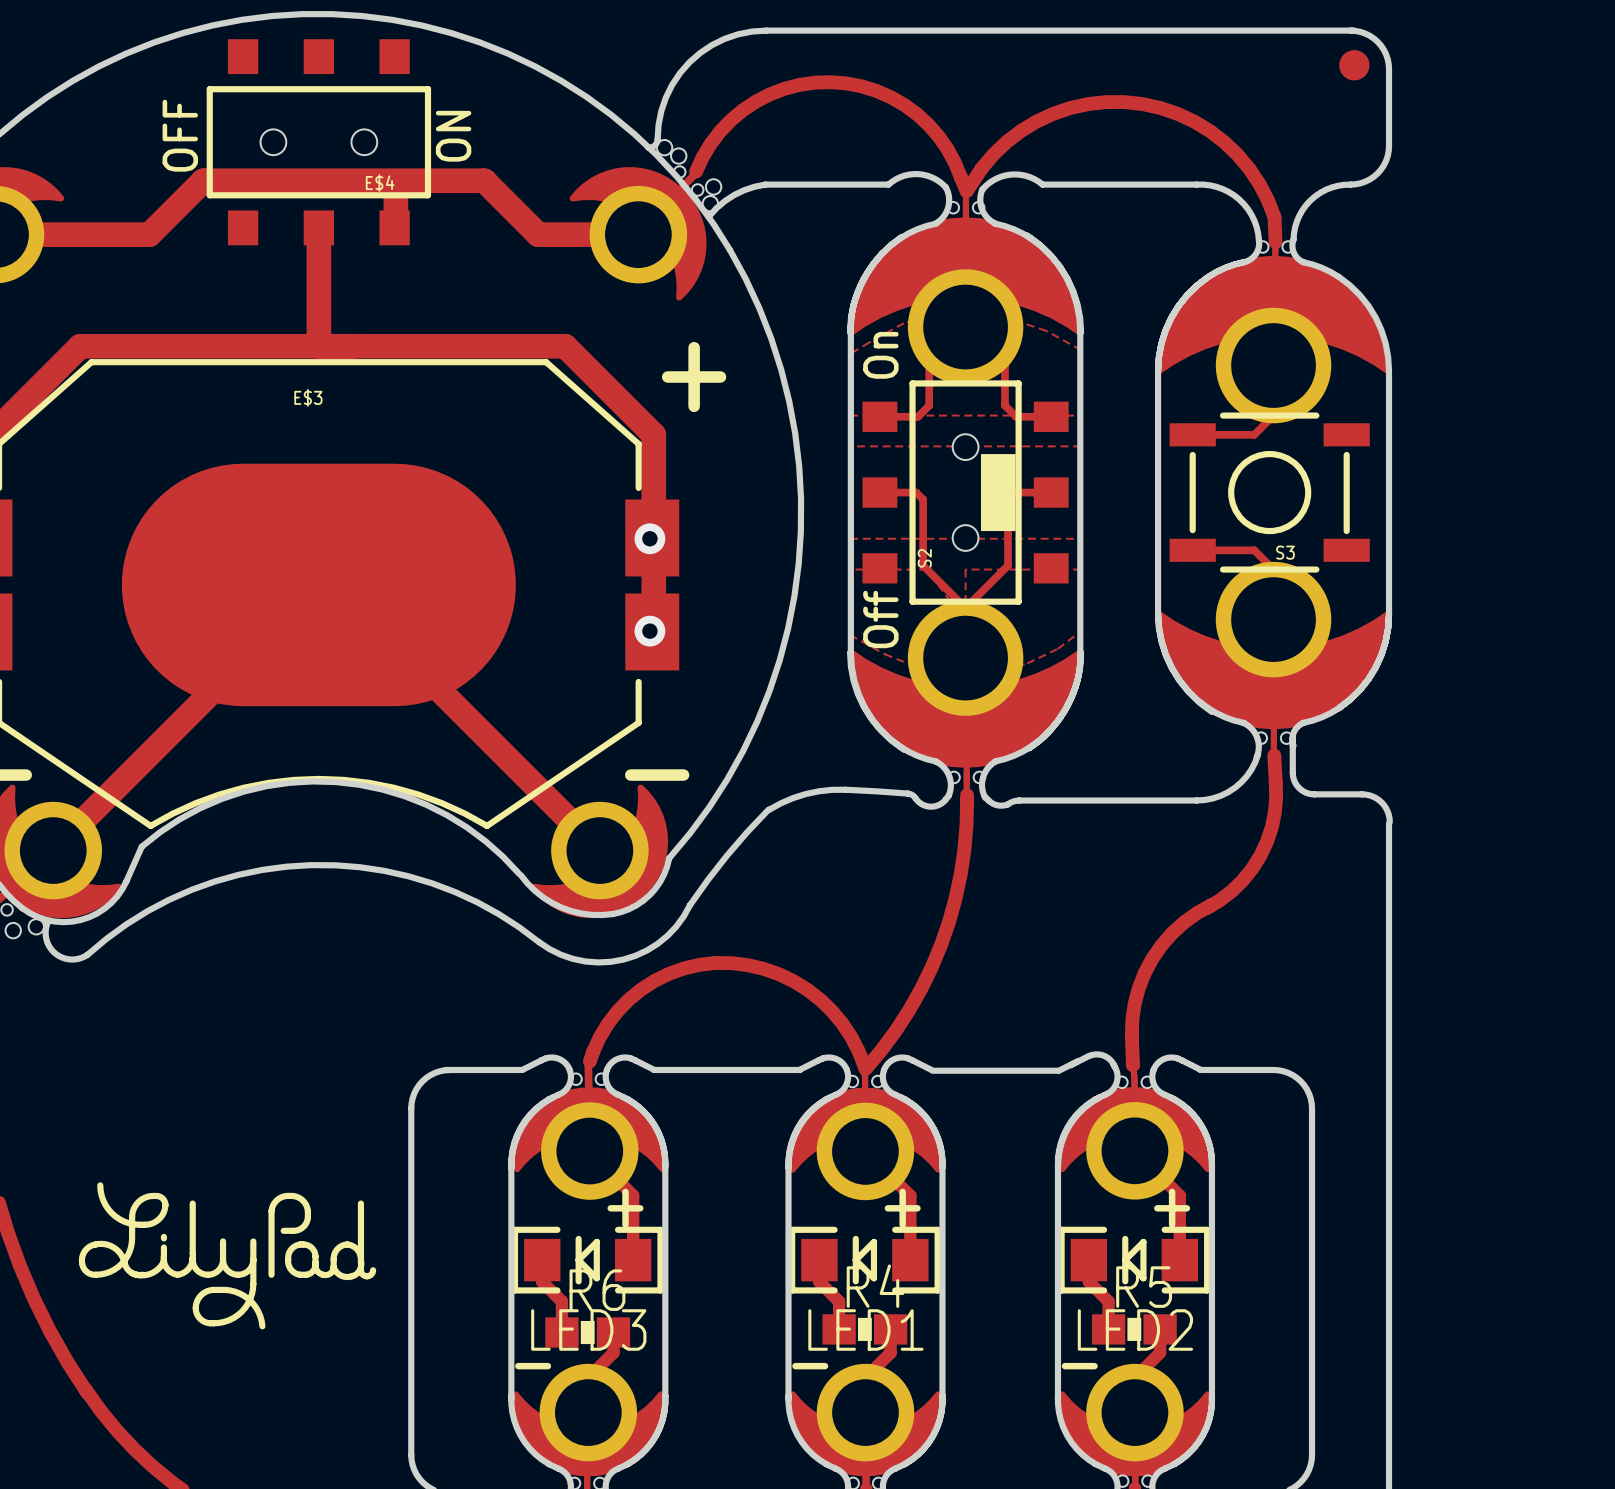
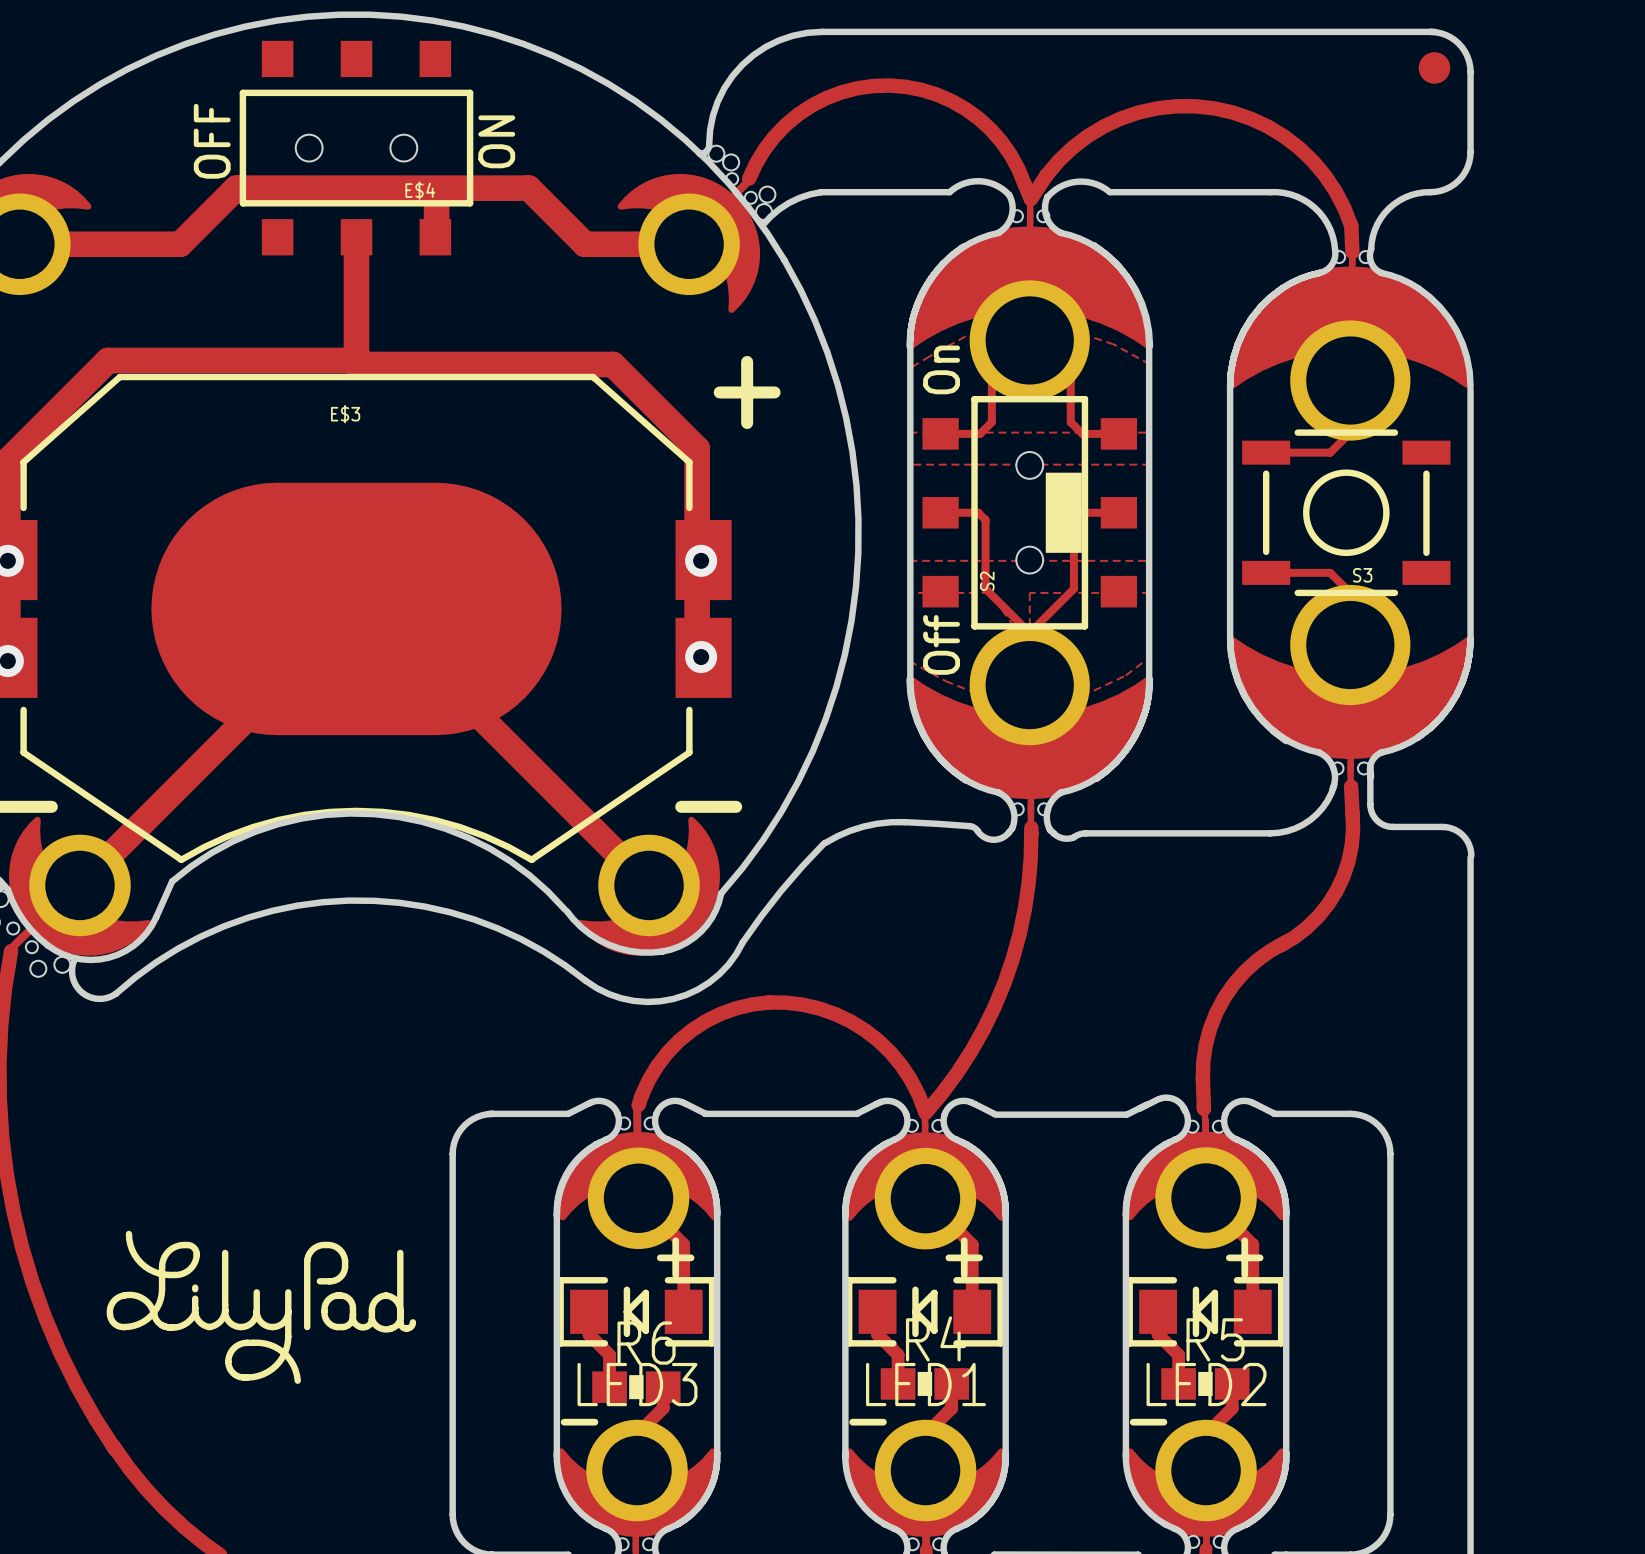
track: (315, 346) (565, 346) (653, 434) (653, 646) -> none
track: none -> (356, 360) (356, 364) (612, 364) (697, 448) (697, 669)

